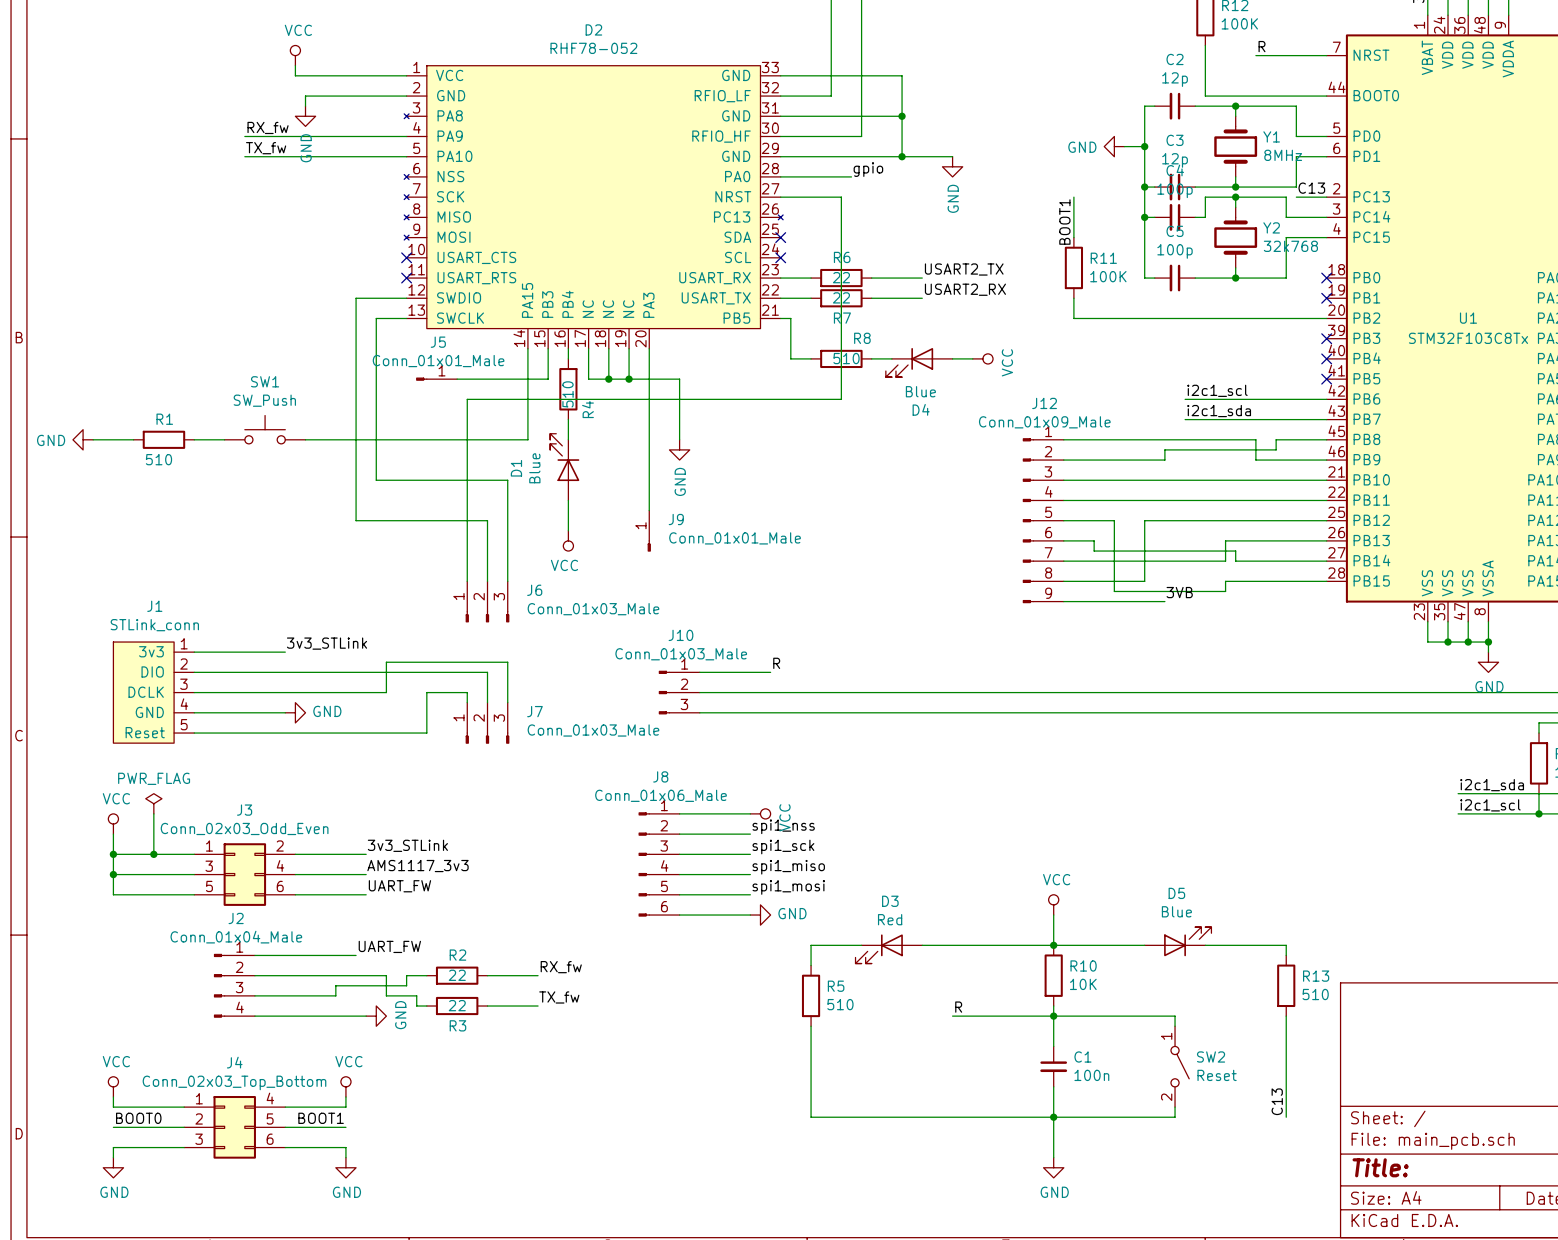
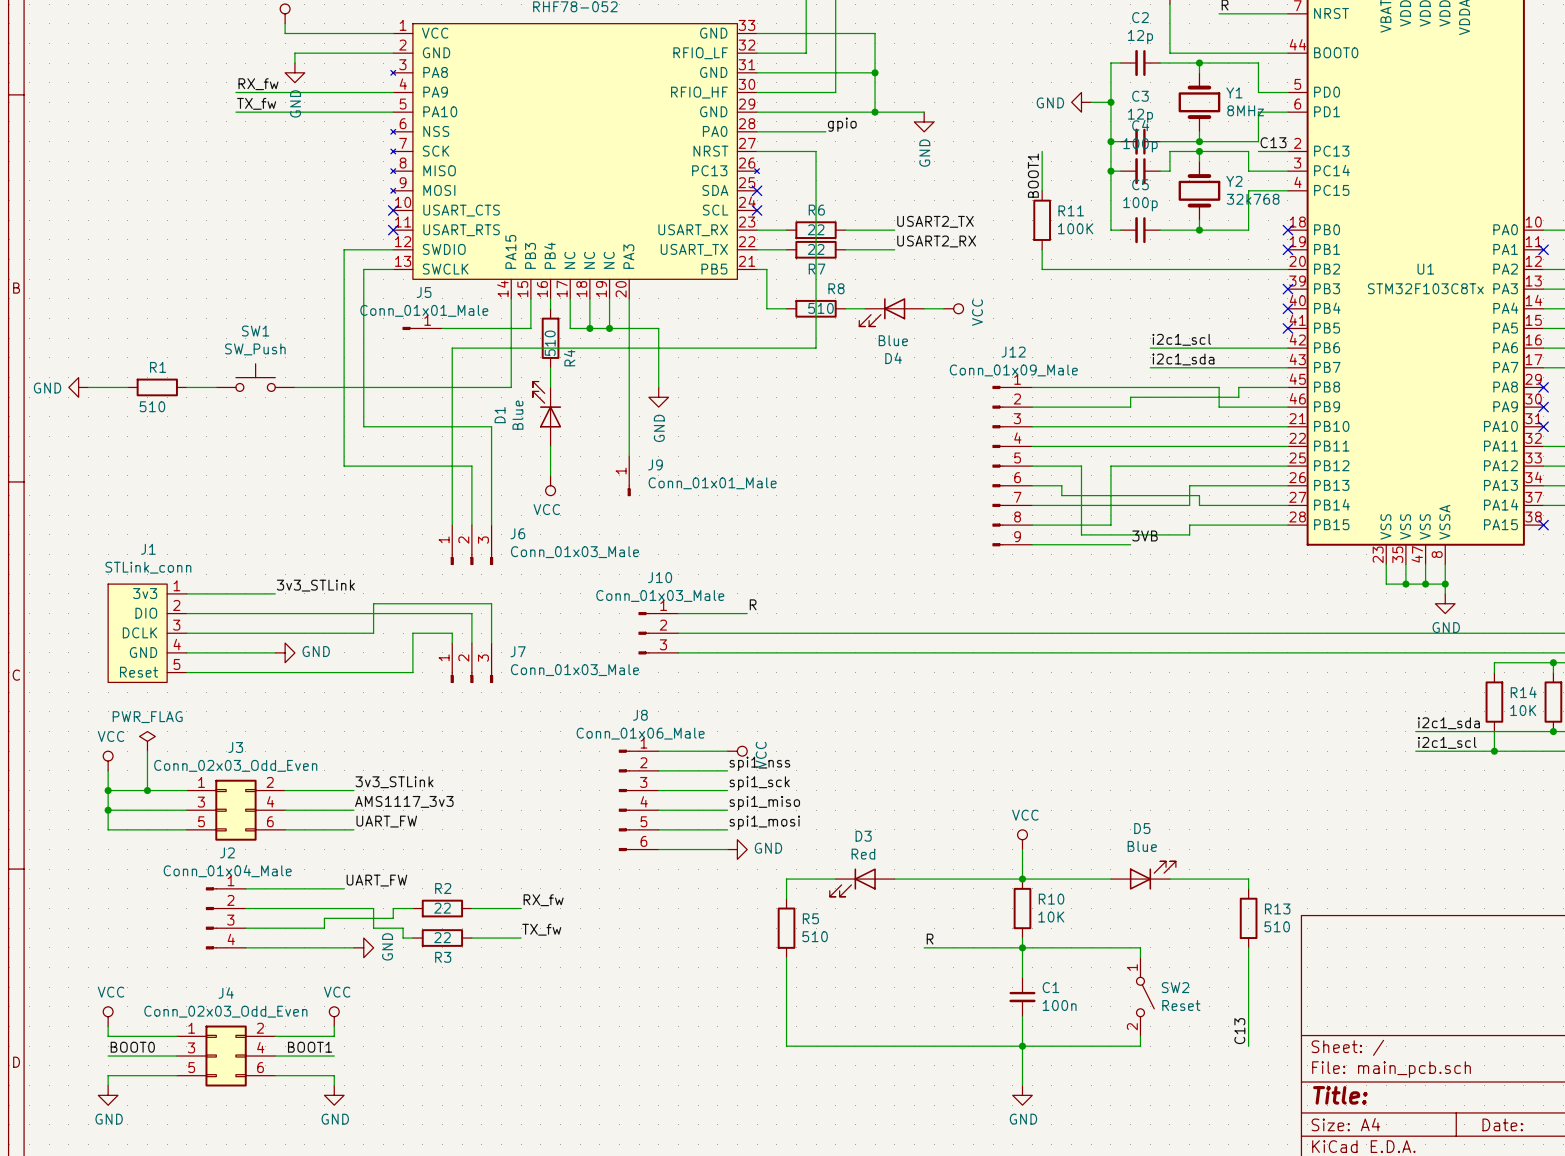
J4 value: Conn_02x03_Top_Bottom (234, 1082) -> Conn_02x03_Odd_Even (225, 1011)
J4 pin number: 4 (270, 1098) -> 2 (260, 1028)
J4 pin number: 2 (199, 1118) -> 3 (191, 1047)
J4 pin number: 5 (270, 1118) -> 4 (260, 1047)
J4 pin number: 3 (199, 1139) -> 5 (191, 1067)

